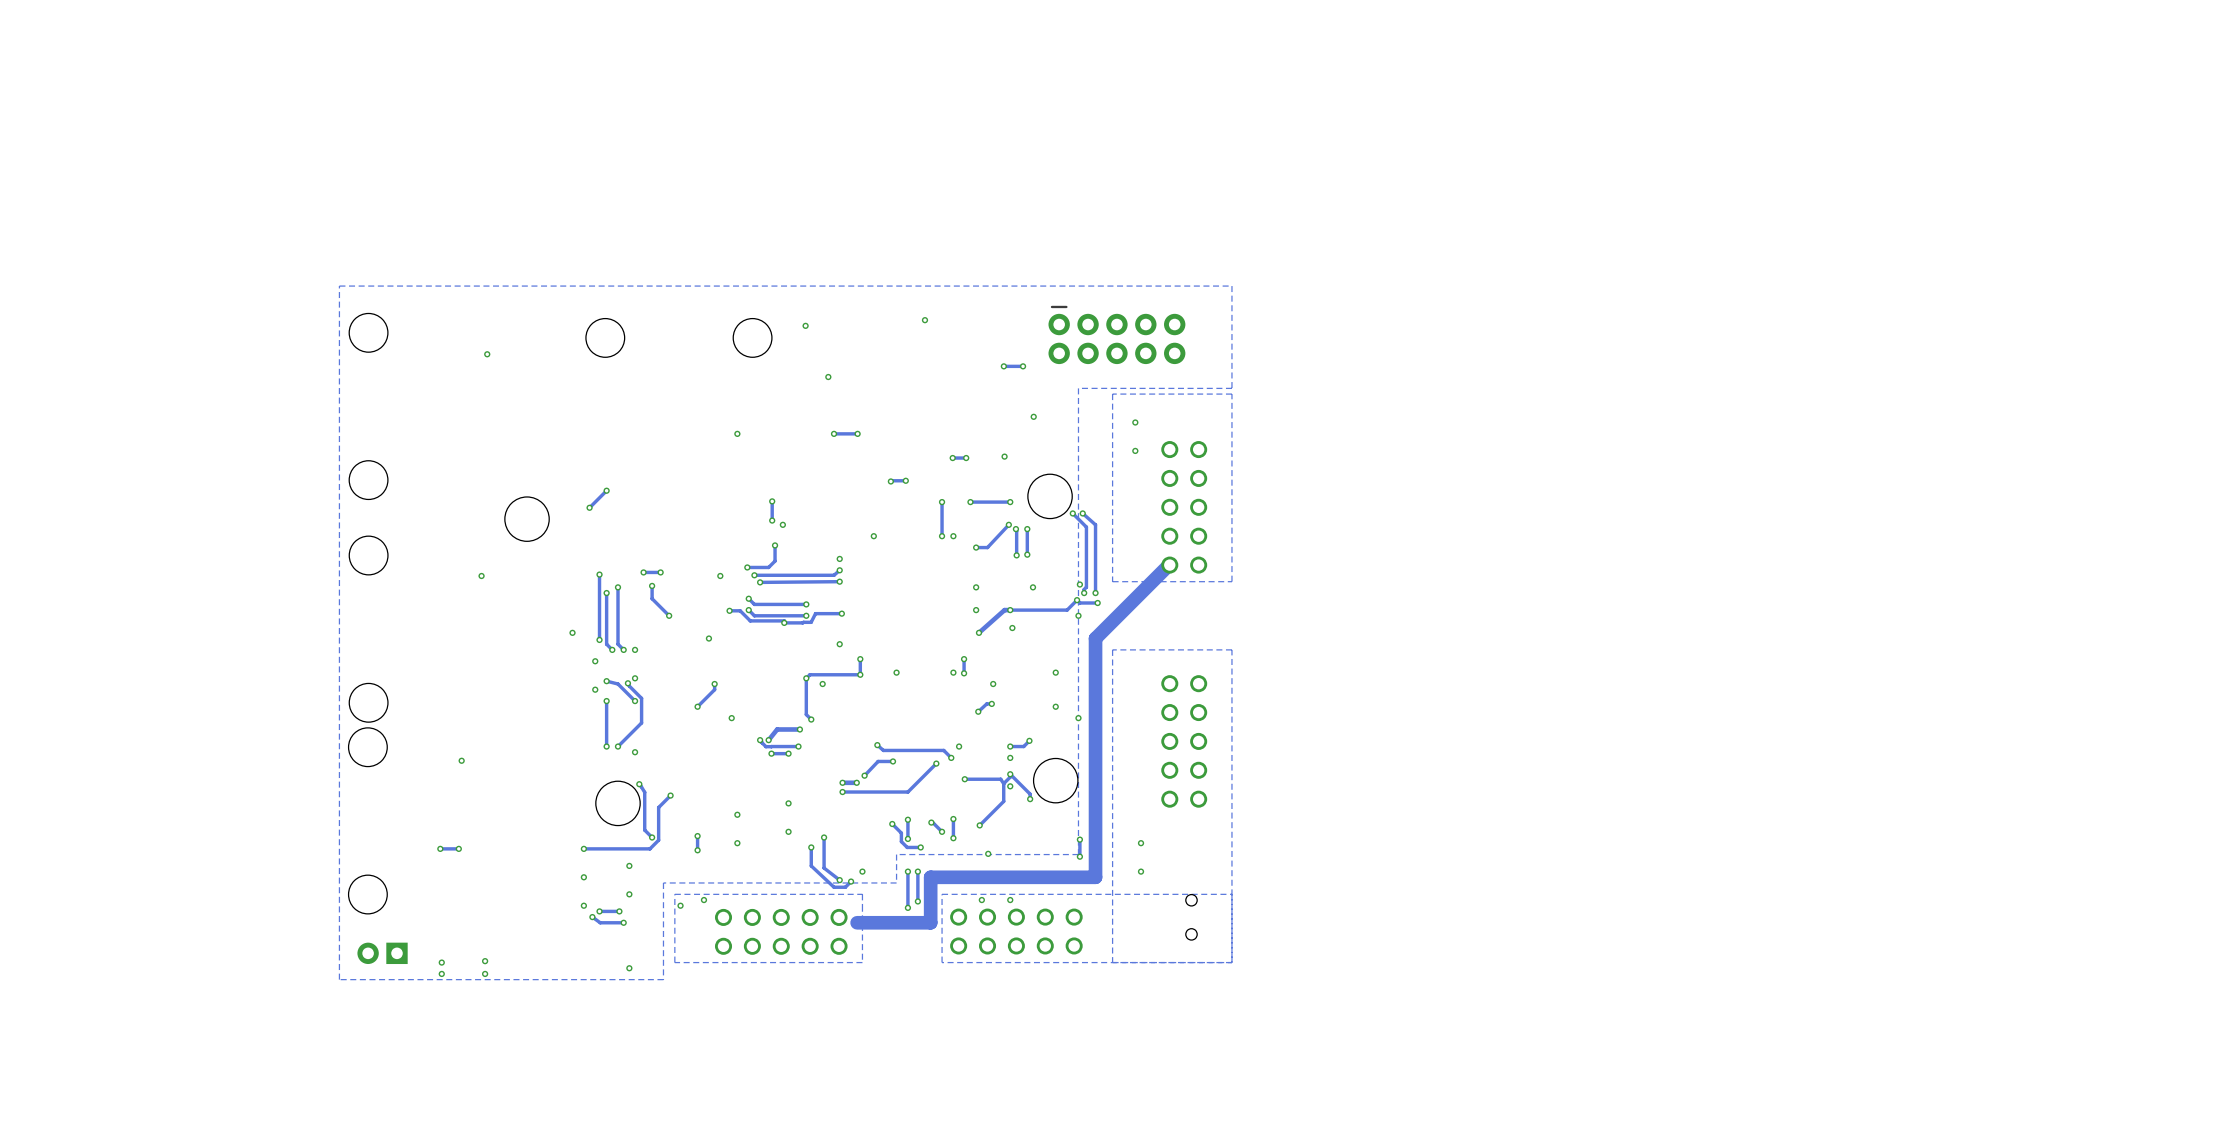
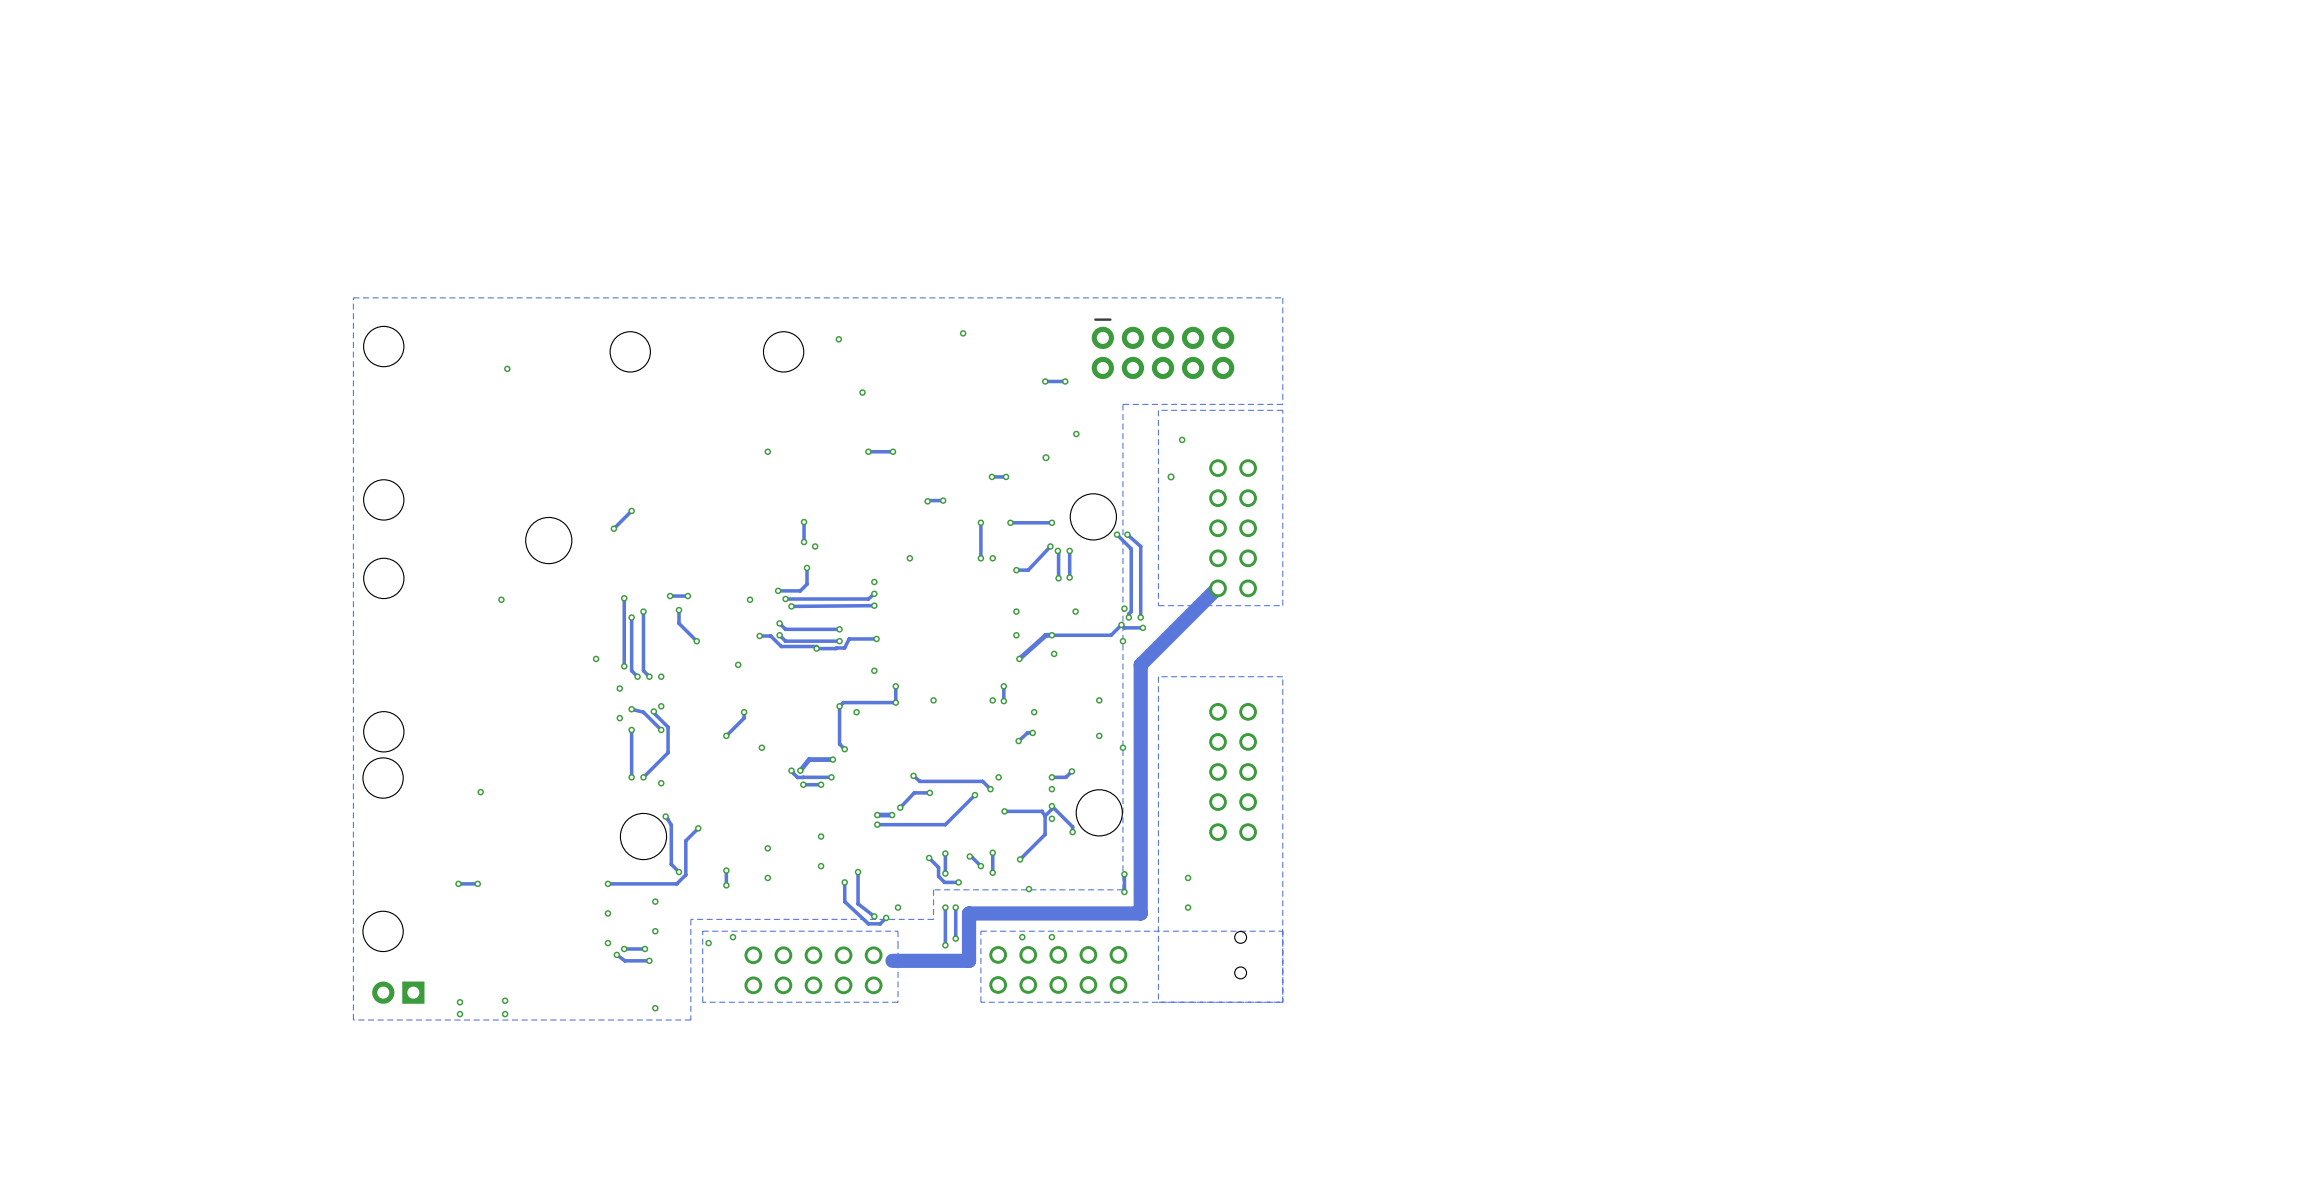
via: none -> (1046, 457)
via: (1135, 450) -> none
via: (1004, 456) -> none
via: none -> (1171, 476)

